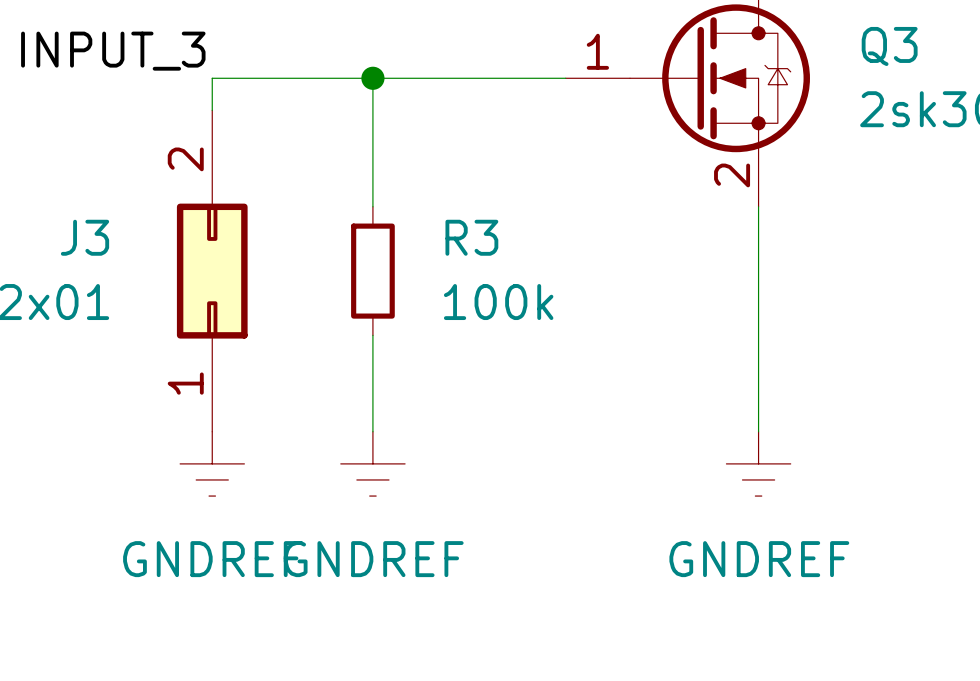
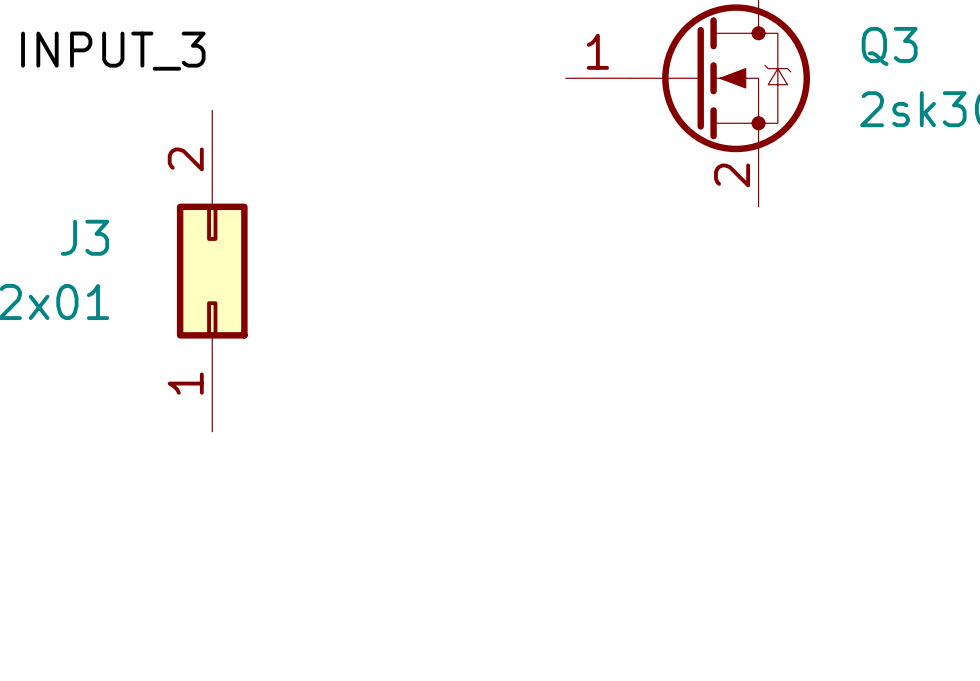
wire: (372, 78) (372, 206) -> none
junction: (372, 78) -> none
wire: (565, 78) (212, 78) (212, 110) -> none
wire: (758, 206) (758, 431) -> none
R3: 100k (372, 271) -> none
wire: (372, 335) (372, 431) -> none
power symbol: GNDREF (212, 463) -> none
power symbol: GNDREF (372, 463) -> none
power symbol: GNDREF (758, 463) -> none

